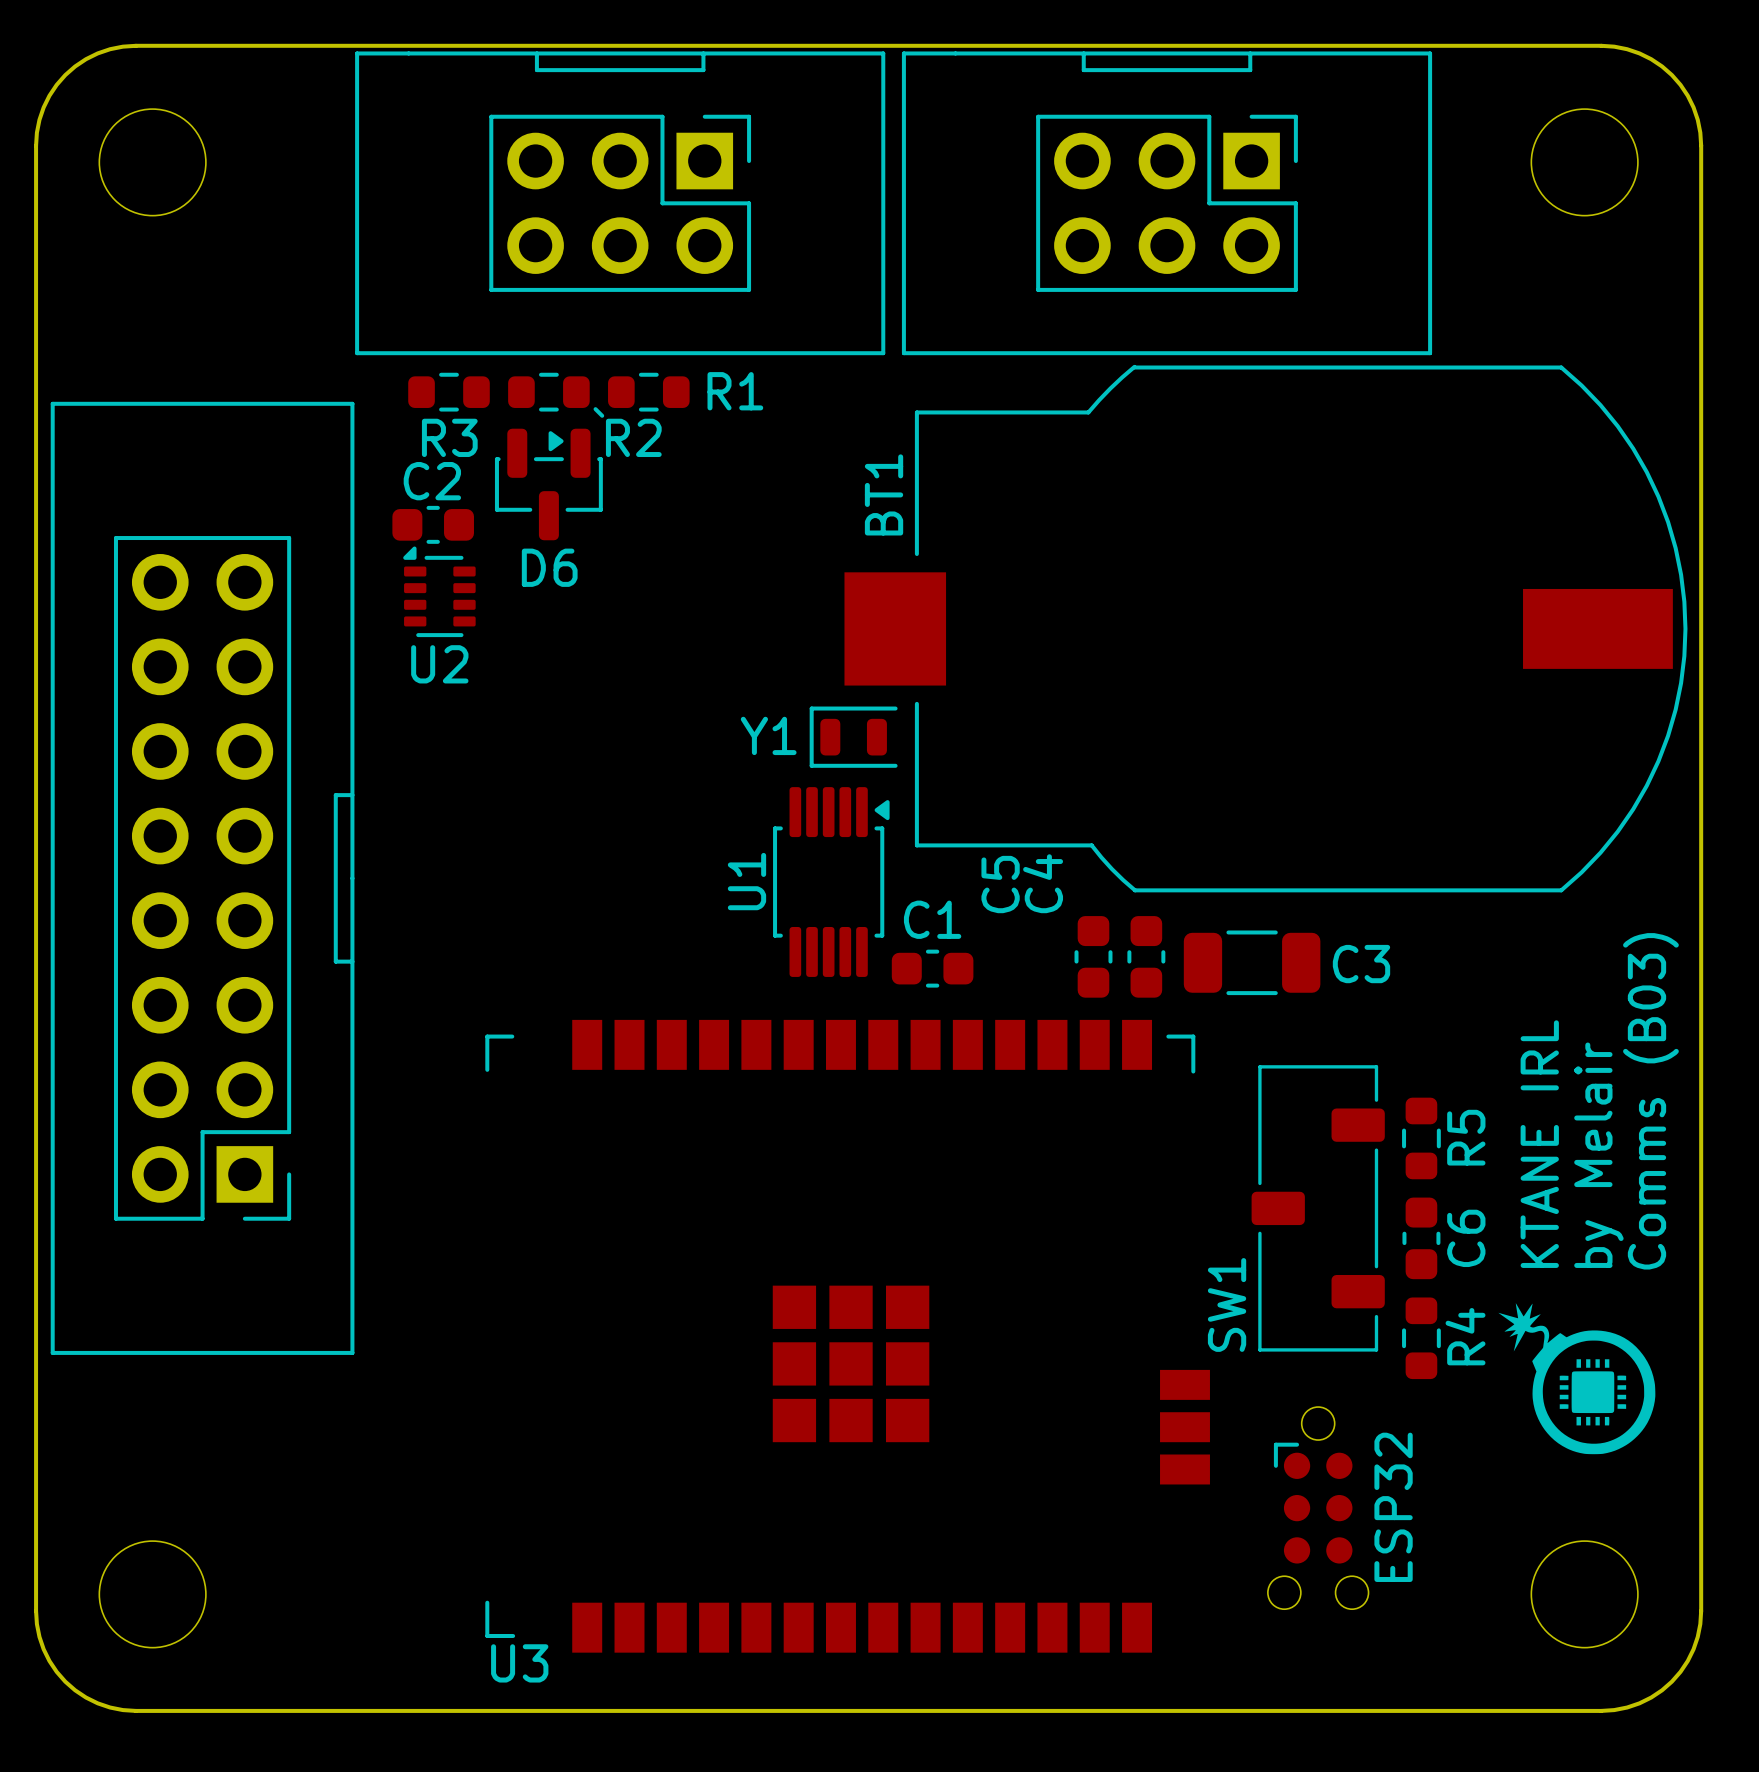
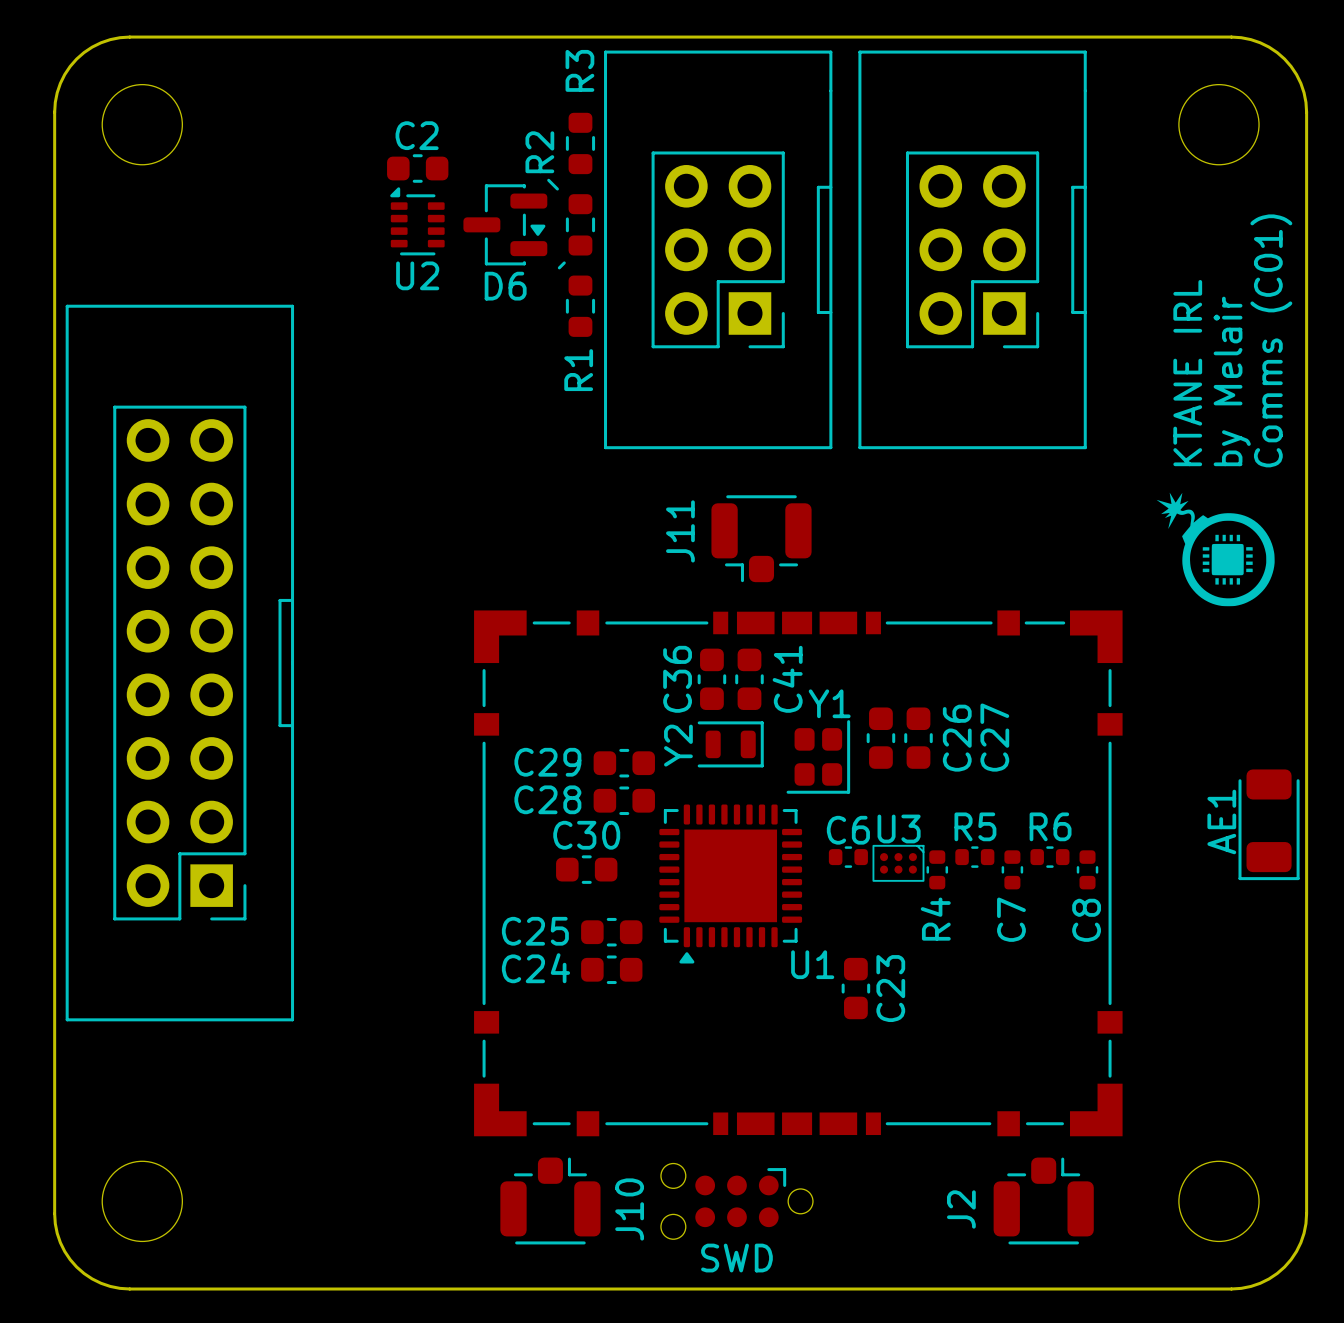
part: (620, 203) -> none
part: (1167, 203) -> none
line: none -> (548, 180) (557, 189)
part: none -> (718, 249)
part: none -> (972, 249)
line: none -> (564, 262) (559, 267)
R3 rotation: 0° (449, 392) -> 90° clockwise (580, 143)
R3 position: (449, 392) -> (580, 143)
R2 rotation: 0° (548, 392) -> 90° clockwise (580, 224)
R2 position: (548, 392) -> (580, 224)
R1 rotation: 0° (648, 392) -> 90° clockwise (580, 306)
R1 position: (648, 392) -> (580, 306)
line: (595, 409) (602, 415) -> none
R3 name position: R3 (449, 437) -> R3 (579, 70)
R2 name position: R2 (633, 437) -> R2 (539, 152)
text: none -> Comms (C01) (1271, 340)
D6 rotation: 0° (548, 484) -> 90° clockwise (505, 224)
D6 position: (548, 484) -> (505, 224)
C2 position: (433, 524) -> (417, 168)
U2 position: (439, 591) -> (417, 221)
BT1: (1265, 628) -> none
Y1 footprint: [809, 706, 898, 768] -> [786, 720, 851, 794]
J11: none -> (761, 538)
Y1 name position: Y1 (768, 735) -> Y1 (829, 703)
U1 footprint: [773, 787, 890, 977] -> [659, 804, 803, 964]
line: none -> (534, 622) (569, 622)
line: none -> (606, 622) (706, 622)
part: none -> (797, 622)
line: none -> (887, 622) (991, 622)
line: none -> (1026, 622) (1063, 622)
U1 name position: U1 (746, 881) -> U1 (812, 964)
line: none -> (484, 670) (484, 705)
line: none -> (1110, 670) (1110, 705)
part: none -> (536, 673)
part: none -> (1059, 673)
C36: none -> (711, 679)
C41: none -> (749, 679)
C5: (1093, 956) -> none
C4: (1146, 956) -> none
C3: (1252, 962) -> none
C1: (932, 968) -> none
C26: none -> (880, 738)
C27: none -> (918, 738)
line: none -> (484, 743) (484, 1003)
line: none -> (1110, 743) (1110, 1003)
Y2: none -> (730, 744)
C29: none -> (624, 763)
U3 footprint: [485, 1019, 1210, 1653] -> [872, 844, 925, 882]
C28: none -> (624, 800)
AE1: none -> (1269, 824)
R5 footprint: [1402, 1097, 1441, 1180] -> [955, 846, 995, 868]
text: Comms (B03) (1650, 1101) -> none
R6: none -> (1049, 857)
text position: KTANE IRL (1539, 1144) -> KTANE IRL (1187, 373)
C30: none -> (586, 869)
C7: none -> (1012, 869)
C8: none -> (1087, 869)
text position: by Melair (1598, 1155) -> by Melair (1232, 381)
C6 footprint: [1402, 1197, 1441, 1280] -> [828, 846, 868, 868]
SW1: (1318, 1208) -> none
C25: none -> (611, 932)
C24: none -> (611, 969)
R4 footprint: [1402, 1297, 1441, 1380] -> [926, 850, 949, 890]
C23: none -> (855, 988)
R4 name position: R4 (1465, 1336) -> R4 (935, 919)
drawing position: (1576, 1378) -> (1215, 549)
line: none -> (484, 1041) (484, 1076)
line: none -> (1110, 1041) (1110, 1076)
part: none -> (536, 1073)
part: none -> (1059, 1073)
line: none -> (534, 1123) (569, 1123)
line: none -> (606, 1123) (706, 1123)
part: none -> (797, 1123)
line: none -> (887, 1123) (989, 1123)
line: none -> (1027, 1123) (1062, 1123)
part: ESP32 (1318, 1508) -> none
J10: none -> (550, 1200)
J2: none -> (1043, 1200)
part: none -> SWD (736, 1201)
U3 name position: U3 (519, 1663) -> U3 (899, 828)

